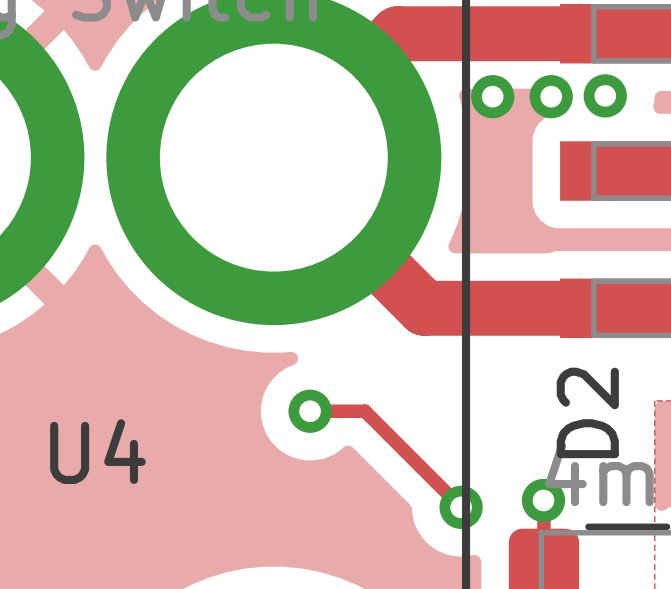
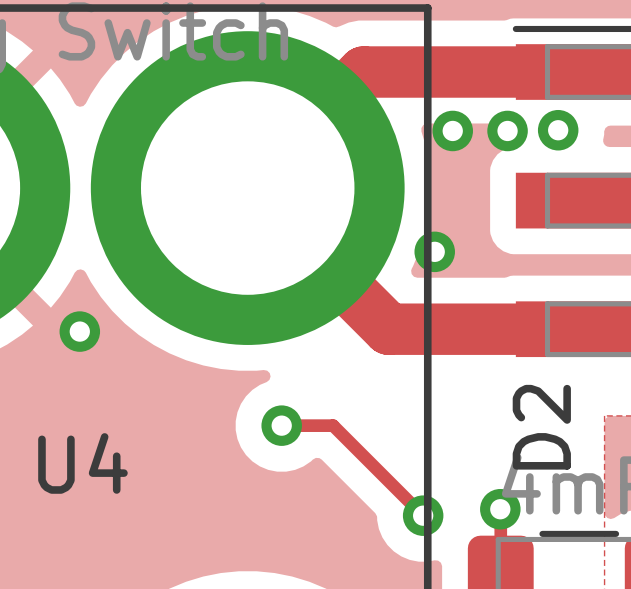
via: none -> (434, 251)
via: none -> (79, 331)

